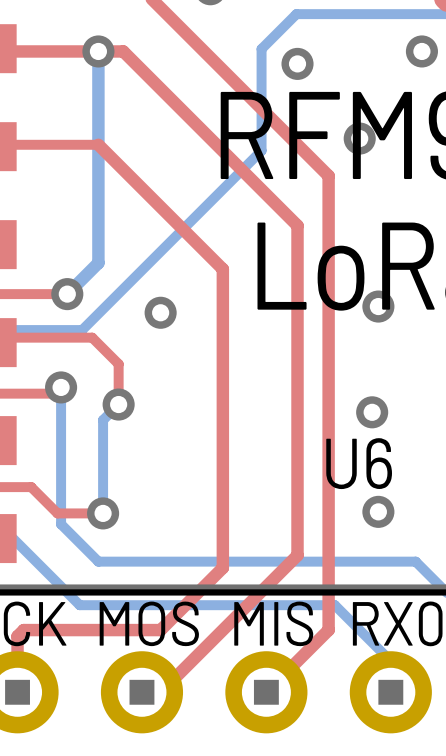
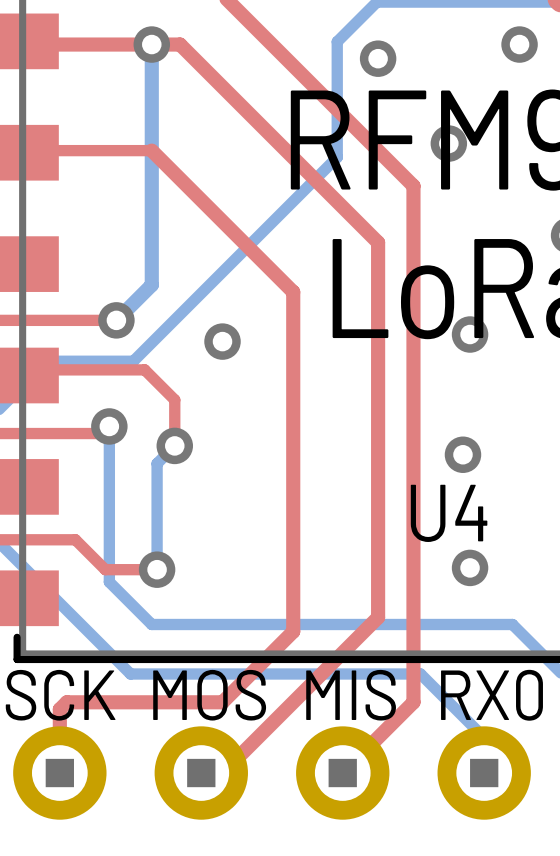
U6 name: U6 (359, 463) -> U4 (449, 513)

